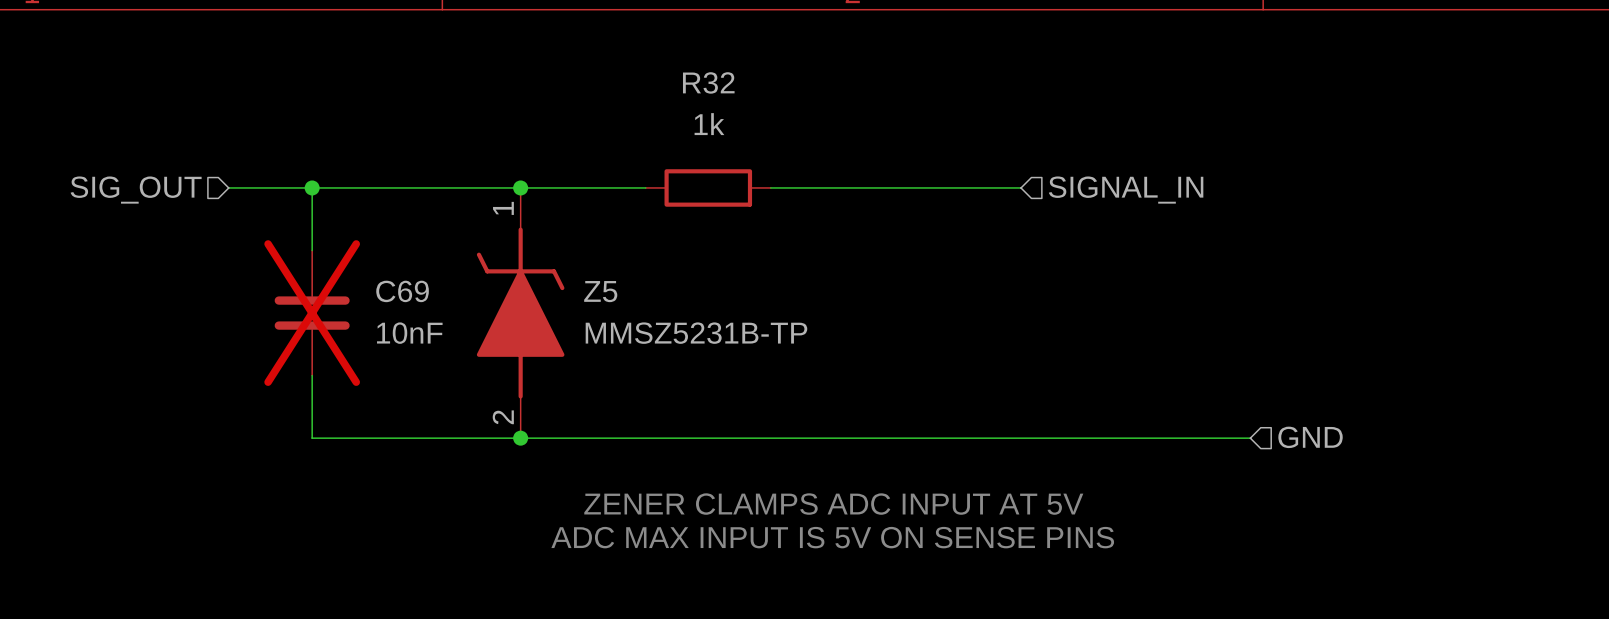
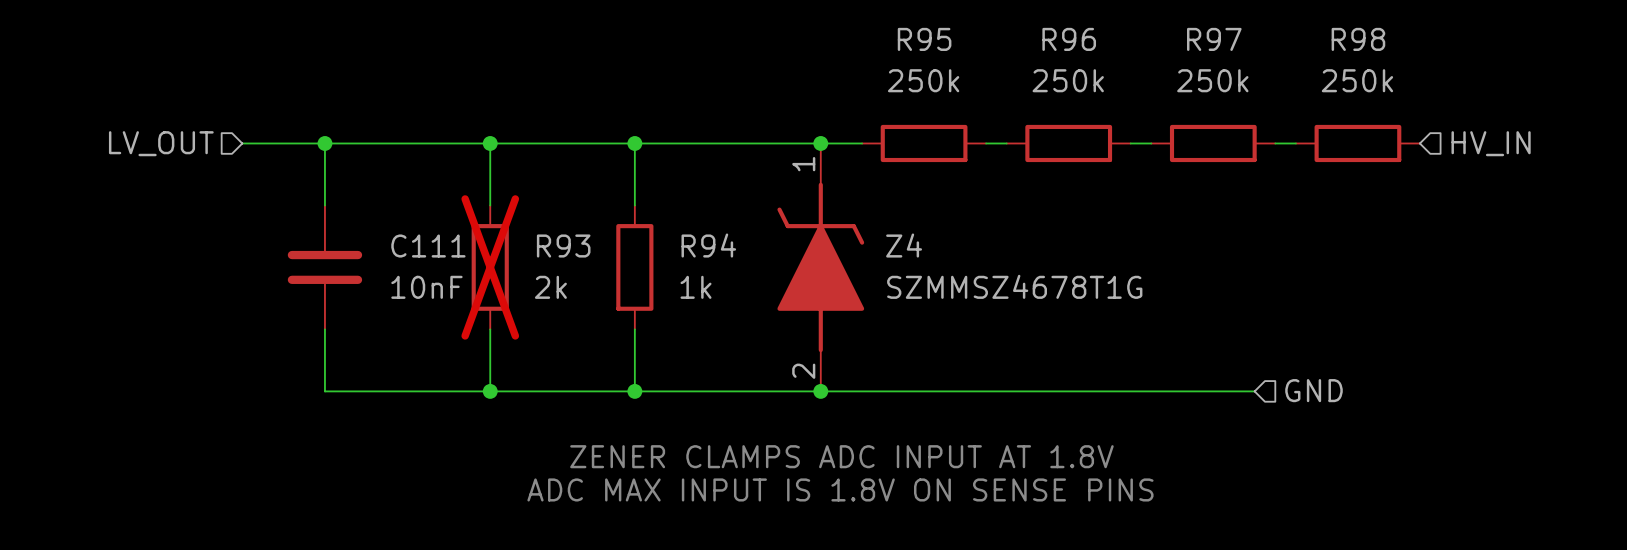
wire: none -> (490, 143) (490, 205)
junction position: (520, 187) -> (490, 143)
wire: none -> (634, 143) (634, 205)
junction: none -> (634, 143)
R32: 1k (708, 187) -> none
junction: none -> (820, 143)
wire: (854, 187) (979, 187) -> (655, 143) (779, 143)
R95: none -> 250k (924, 143)
R96: none -> 250k (1068, 143)
R97: none -> 250k (1213, 143)
wire: none -> (1275, 143) (1295, 143)
R98: none -> 250k (1357, 143)
hierarchical label: SIG_OUT (136, 190) -> LV_OUT (161, 143)
hierarchical label: SIGNAL_IN (1126, 190) -> none
hierarchical label: none -> HV_IN (1491, 143)
C69 name: C69 (402, 291) -> C111 (428, 246)
C69 do-not-place cross: (312, 313) -> none
R93: none -> 2k (490, 267)
Z5: MMSZ5231B-TP (520, 313) -> none
R94: none -> 1k (634, 267)
Z4: none -> SZMMSZ4678T1G (820, 267)
wire: none -> (490, 329) (490, 391)
wire: none -> (634, 329) (634, 391)
junction position: (520, 438) -> (490, 391)
junction: none -> (634, 391)
junction: none -> (820, 391)
text: ZENER CLAMPS ADC INPUT AT 5V (833, 504) -> ZENER CLAMPS ADC INPUT AT 1.8V (841, 456)
text: ADC MAX INPUT IS 5V ON SENSE PINS (832, 537) -> ADC MAX INPUT IS 1.8V ON SENSE PINS (840, 489)

